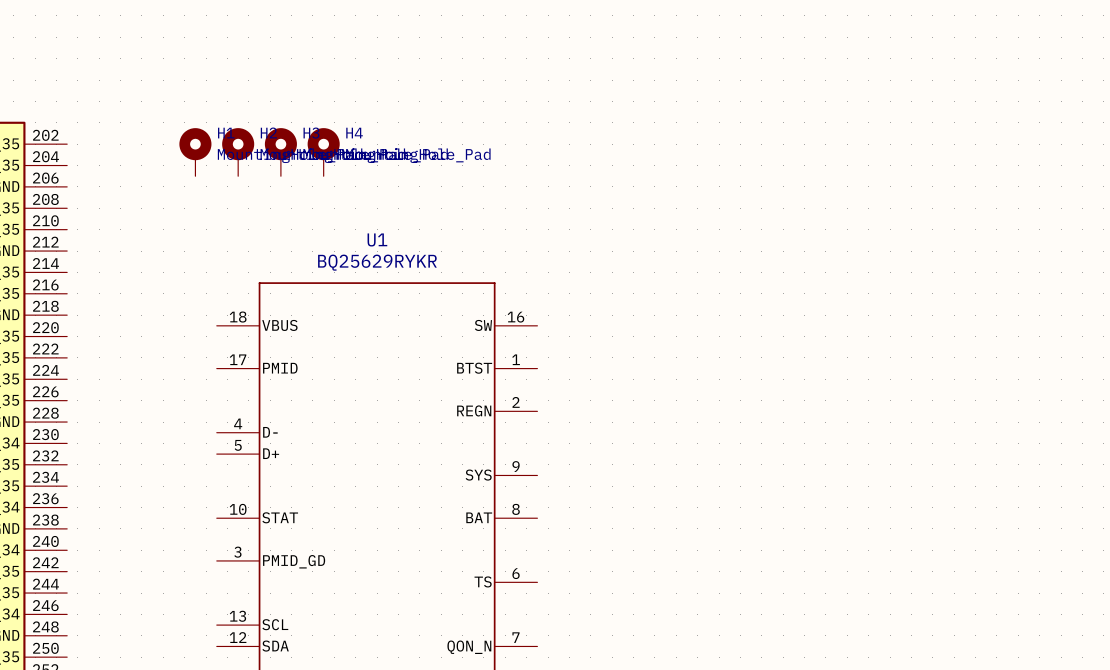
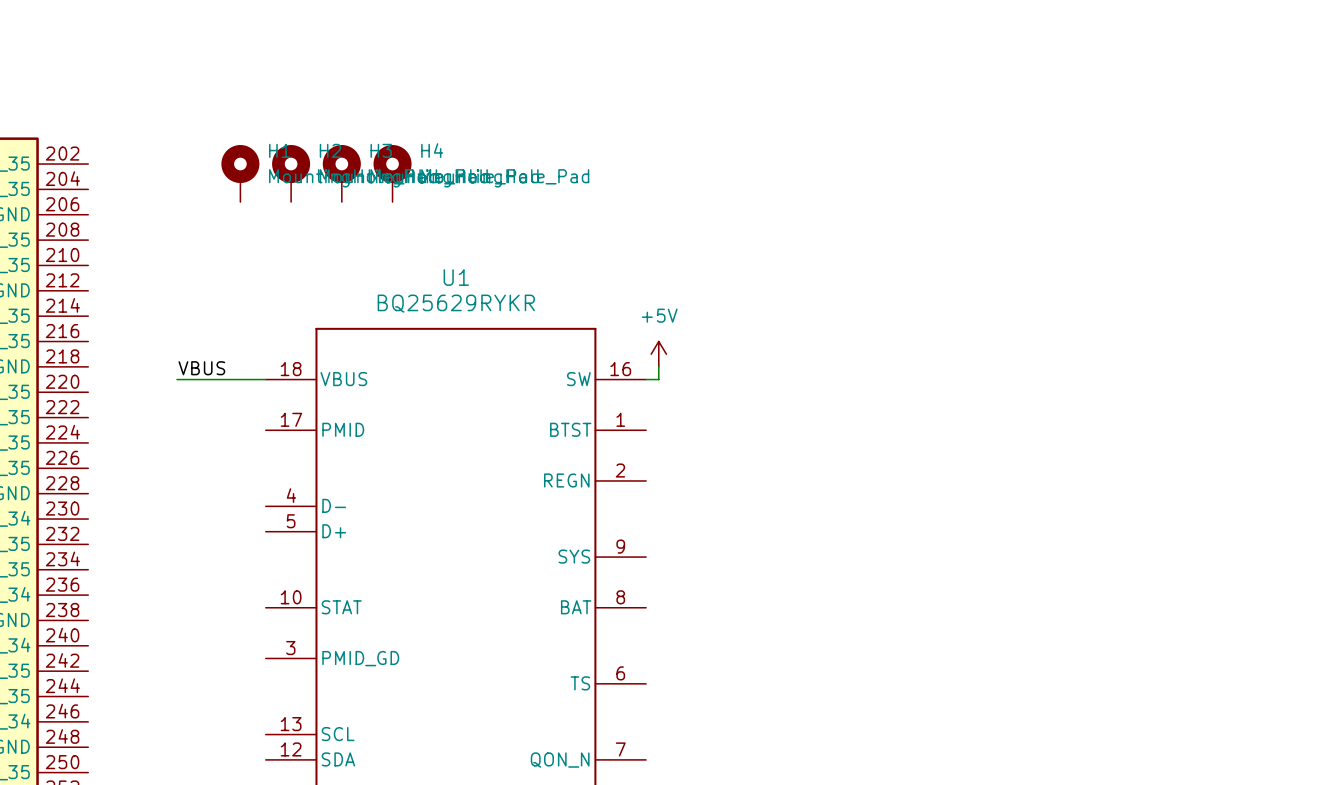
power symbol: none -> +5V (658, 354)
wire: none -> (658, 366) (658, 379) (646, 379)
label: none -> VBUS (201, 368)
wire: none -> (177, 379) (265, 379)

